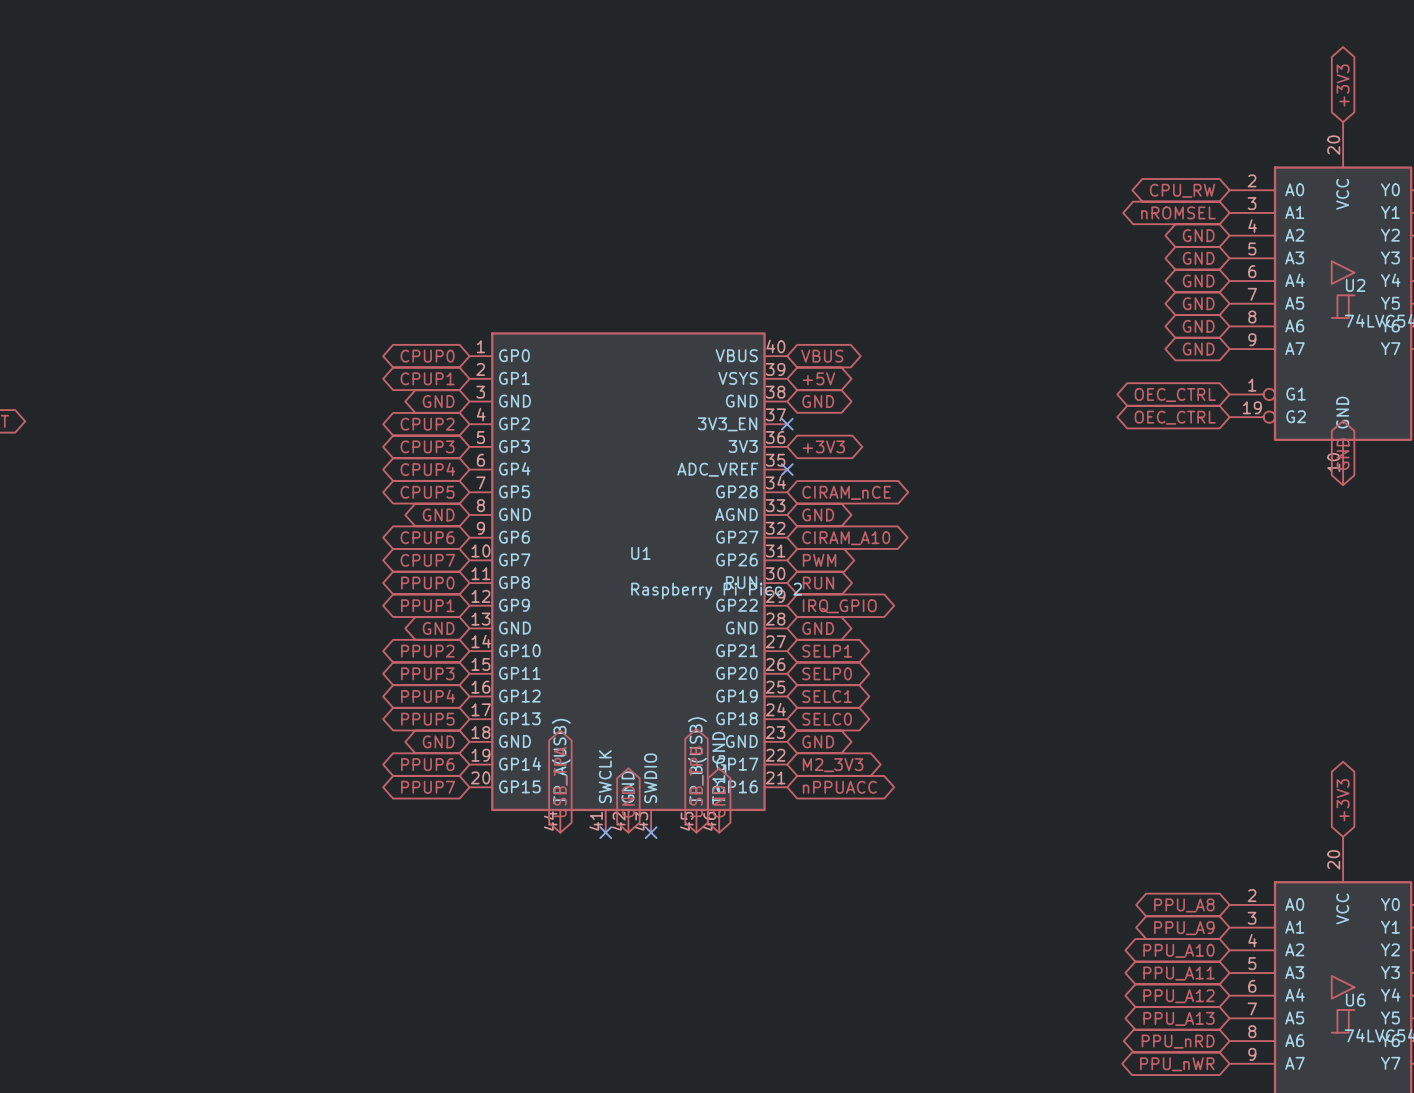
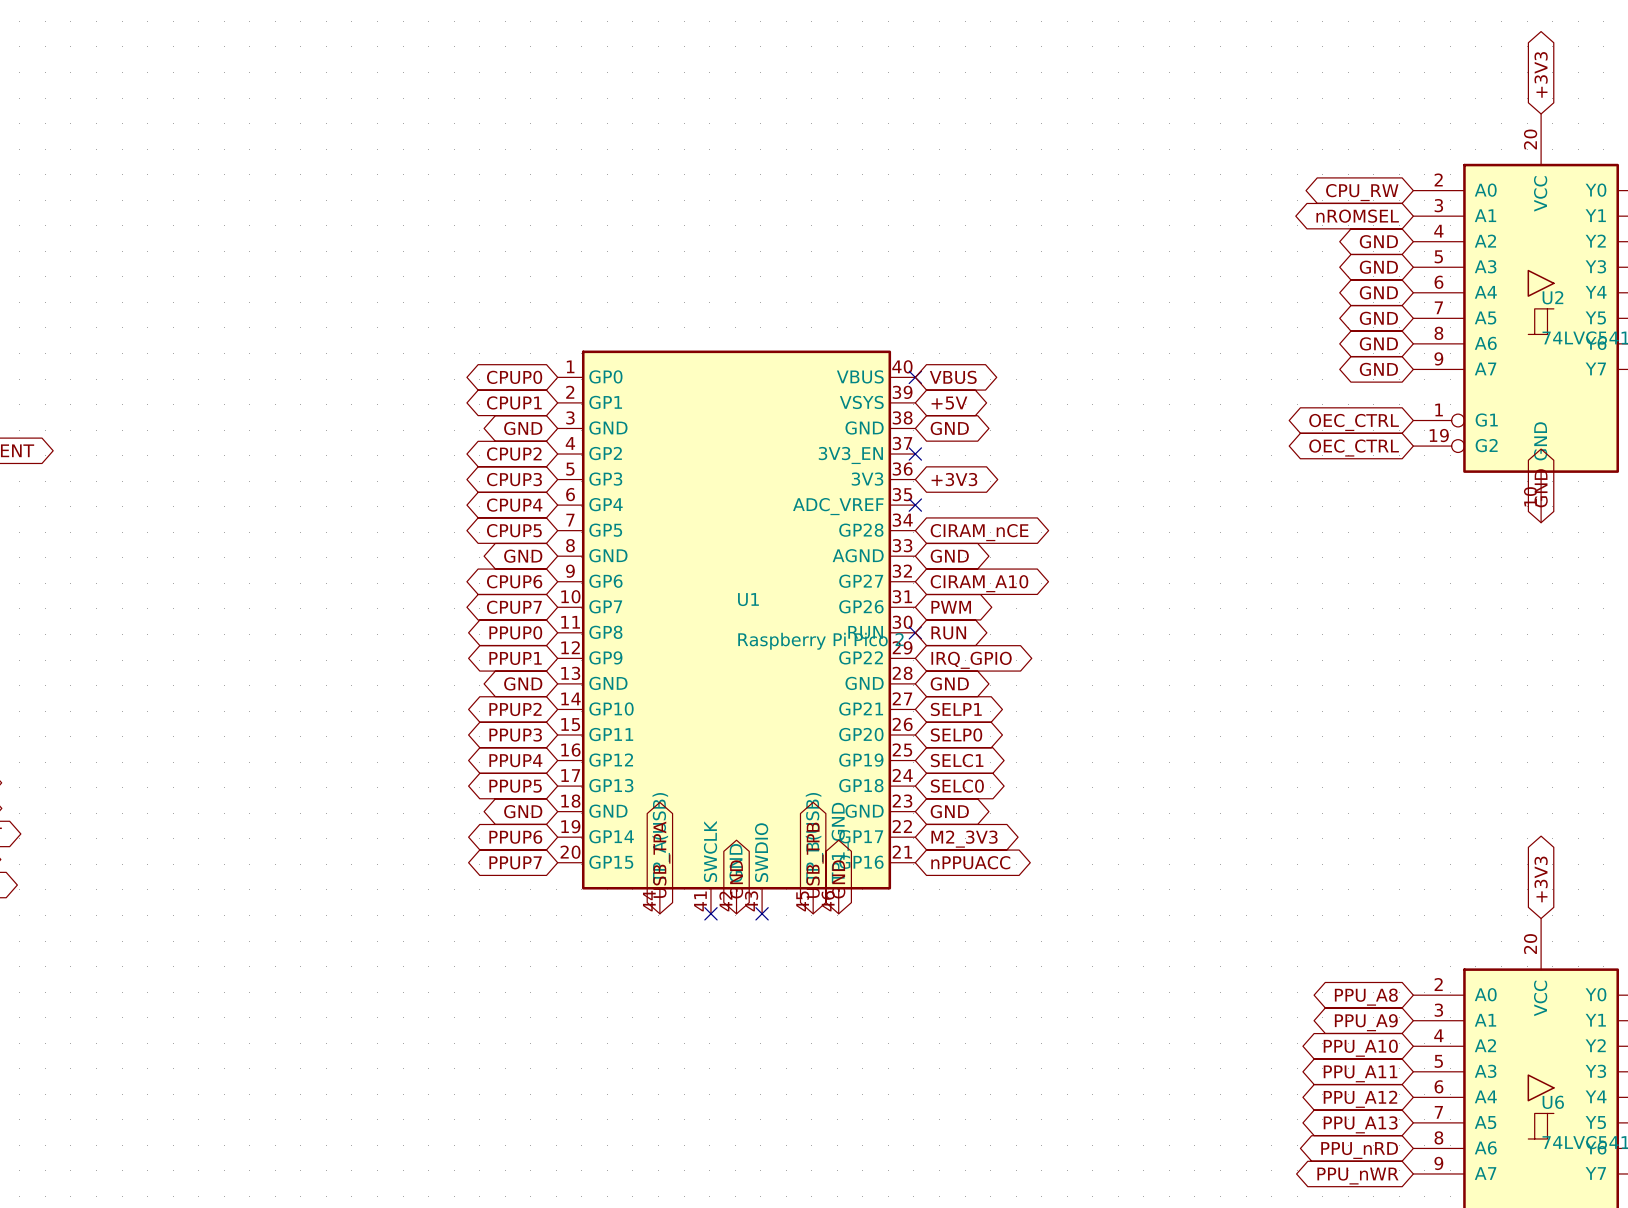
no-connect mark: none -> (915, 377)
no-connect mark: none -> (915, 632)

